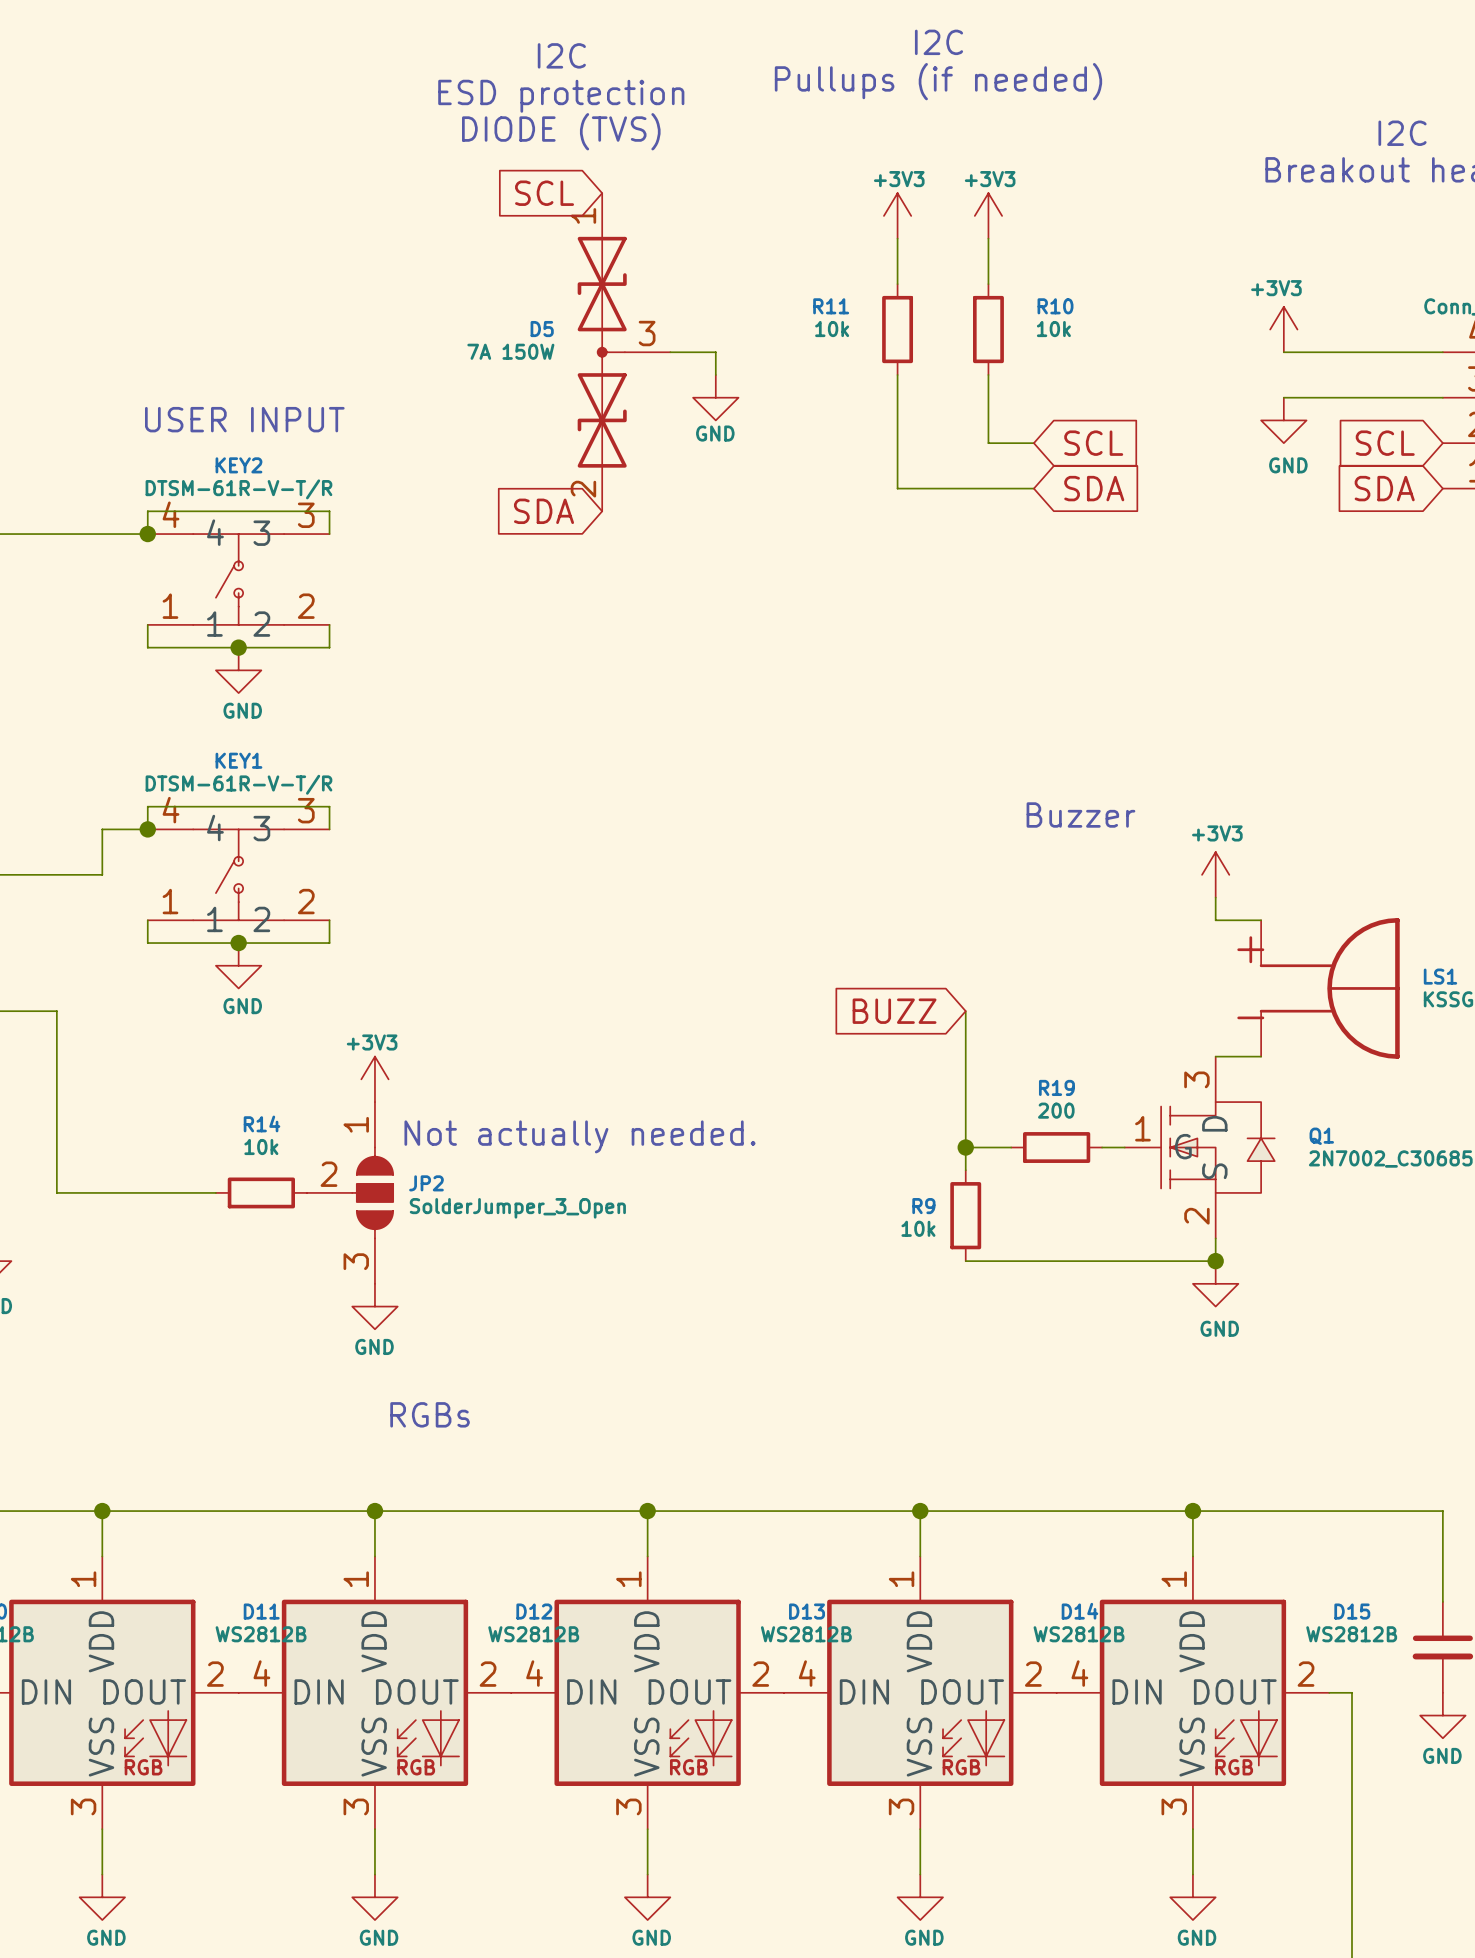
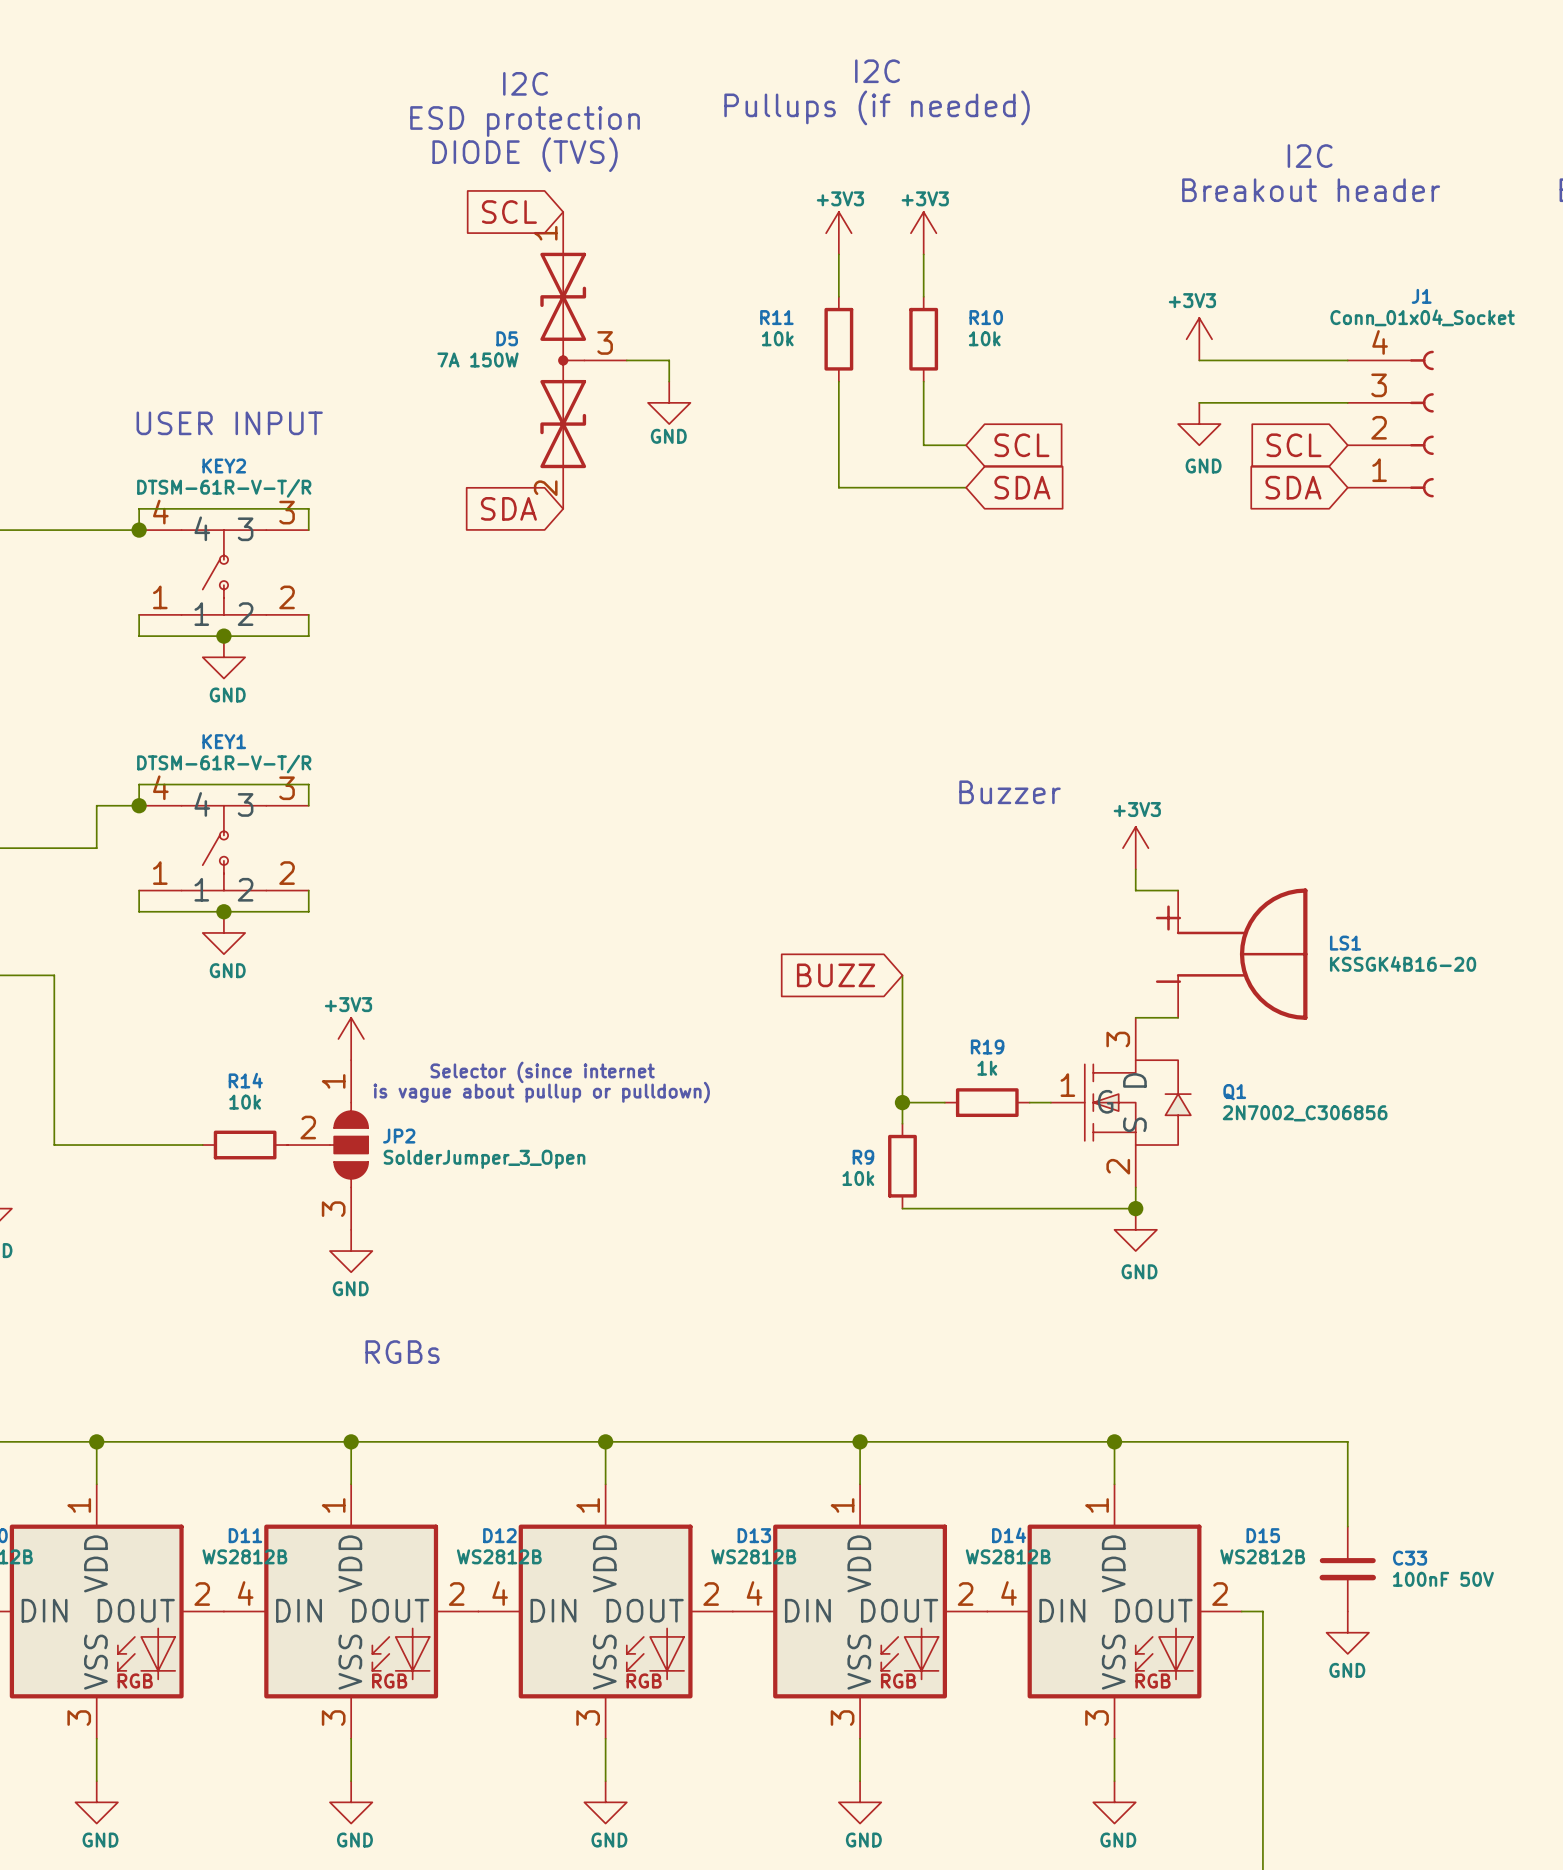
R19 value: 200 (1056, 1110) -> 1k (987, 1068)
text: none -> Selector (since internet (542, 1072)
text: Not actually needed. (580, 1136) -> is vague about pullup or pulldown) (541, 1092)

